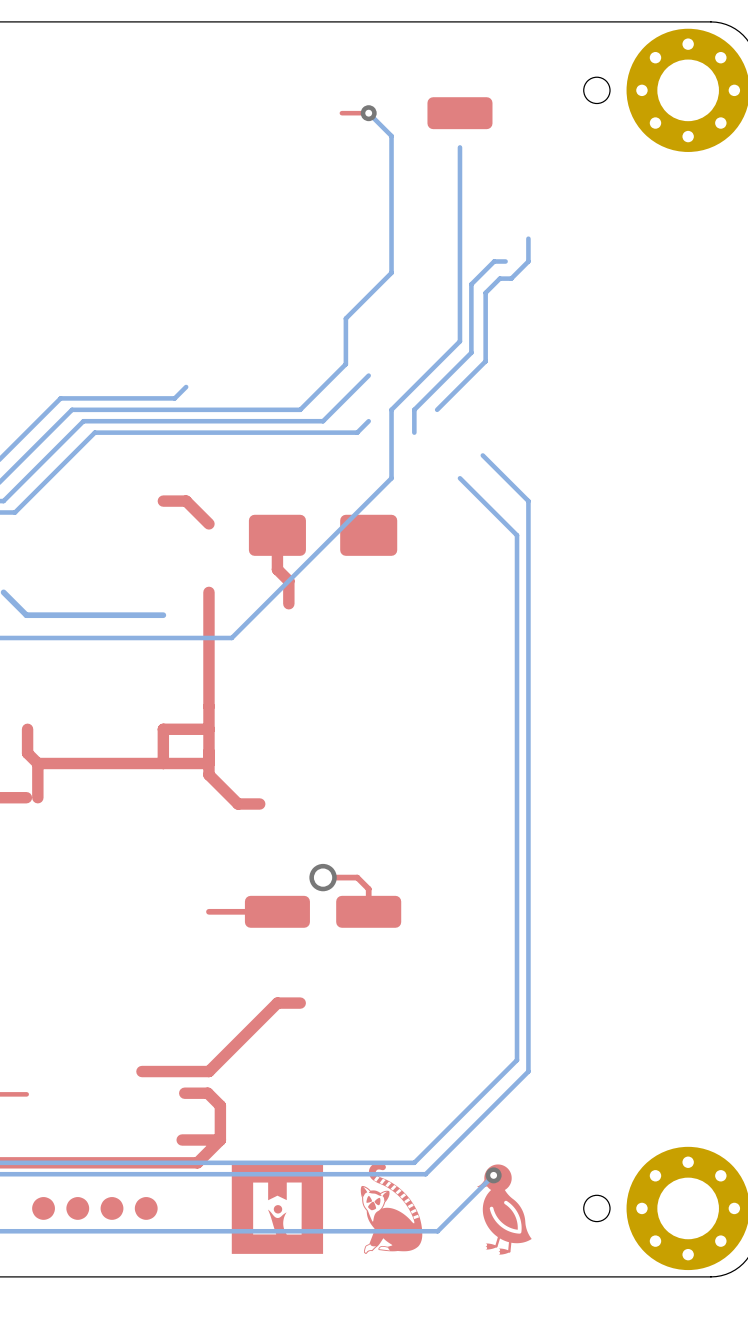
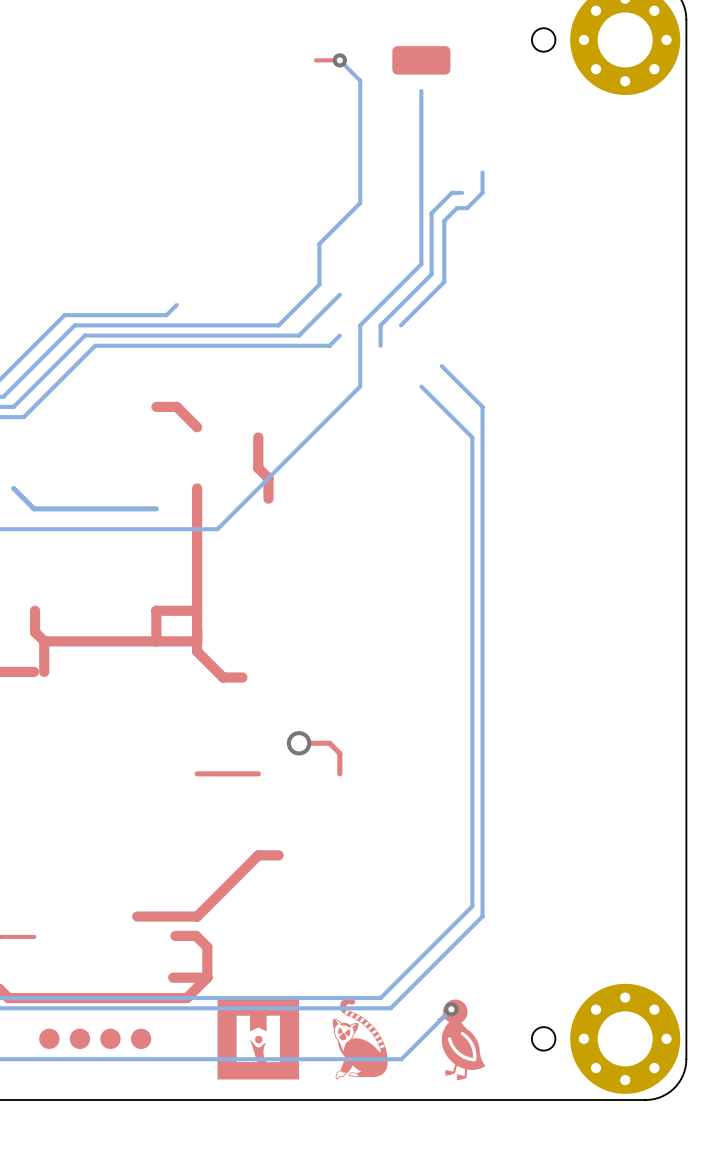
part: (323, 535) -> none
part: (277, 911) -> none
part: (368, 911) -> none

